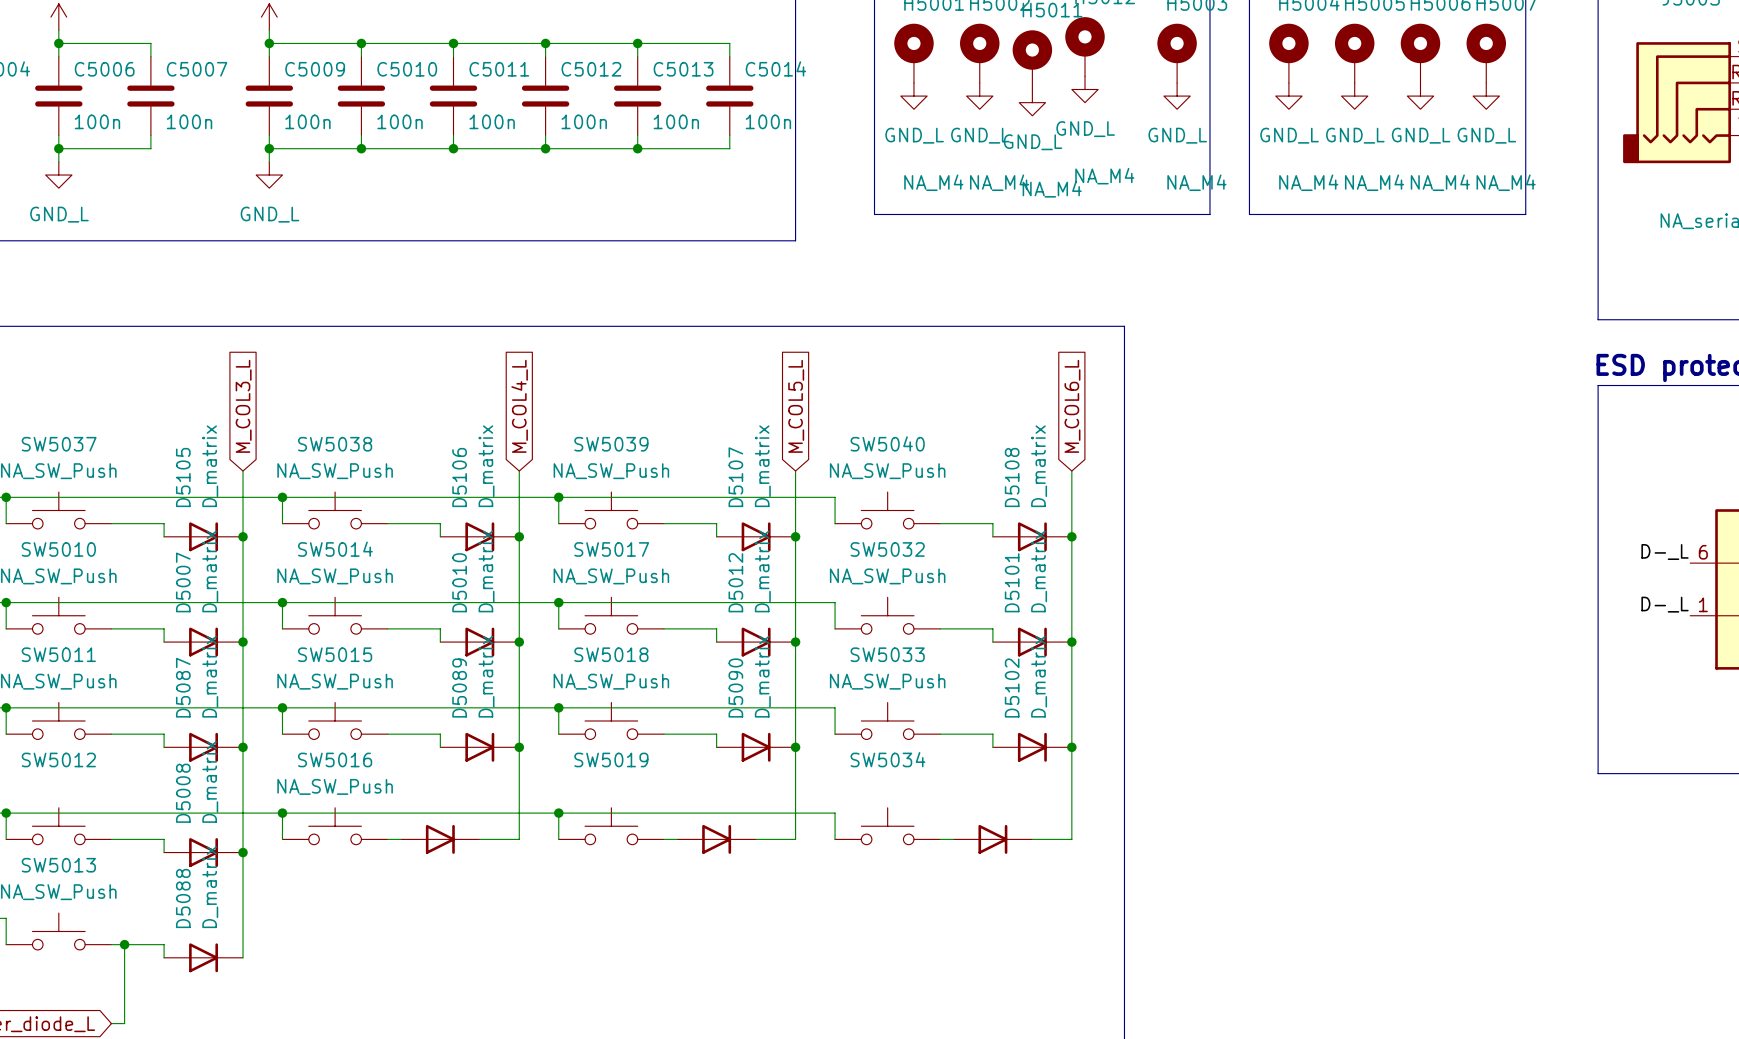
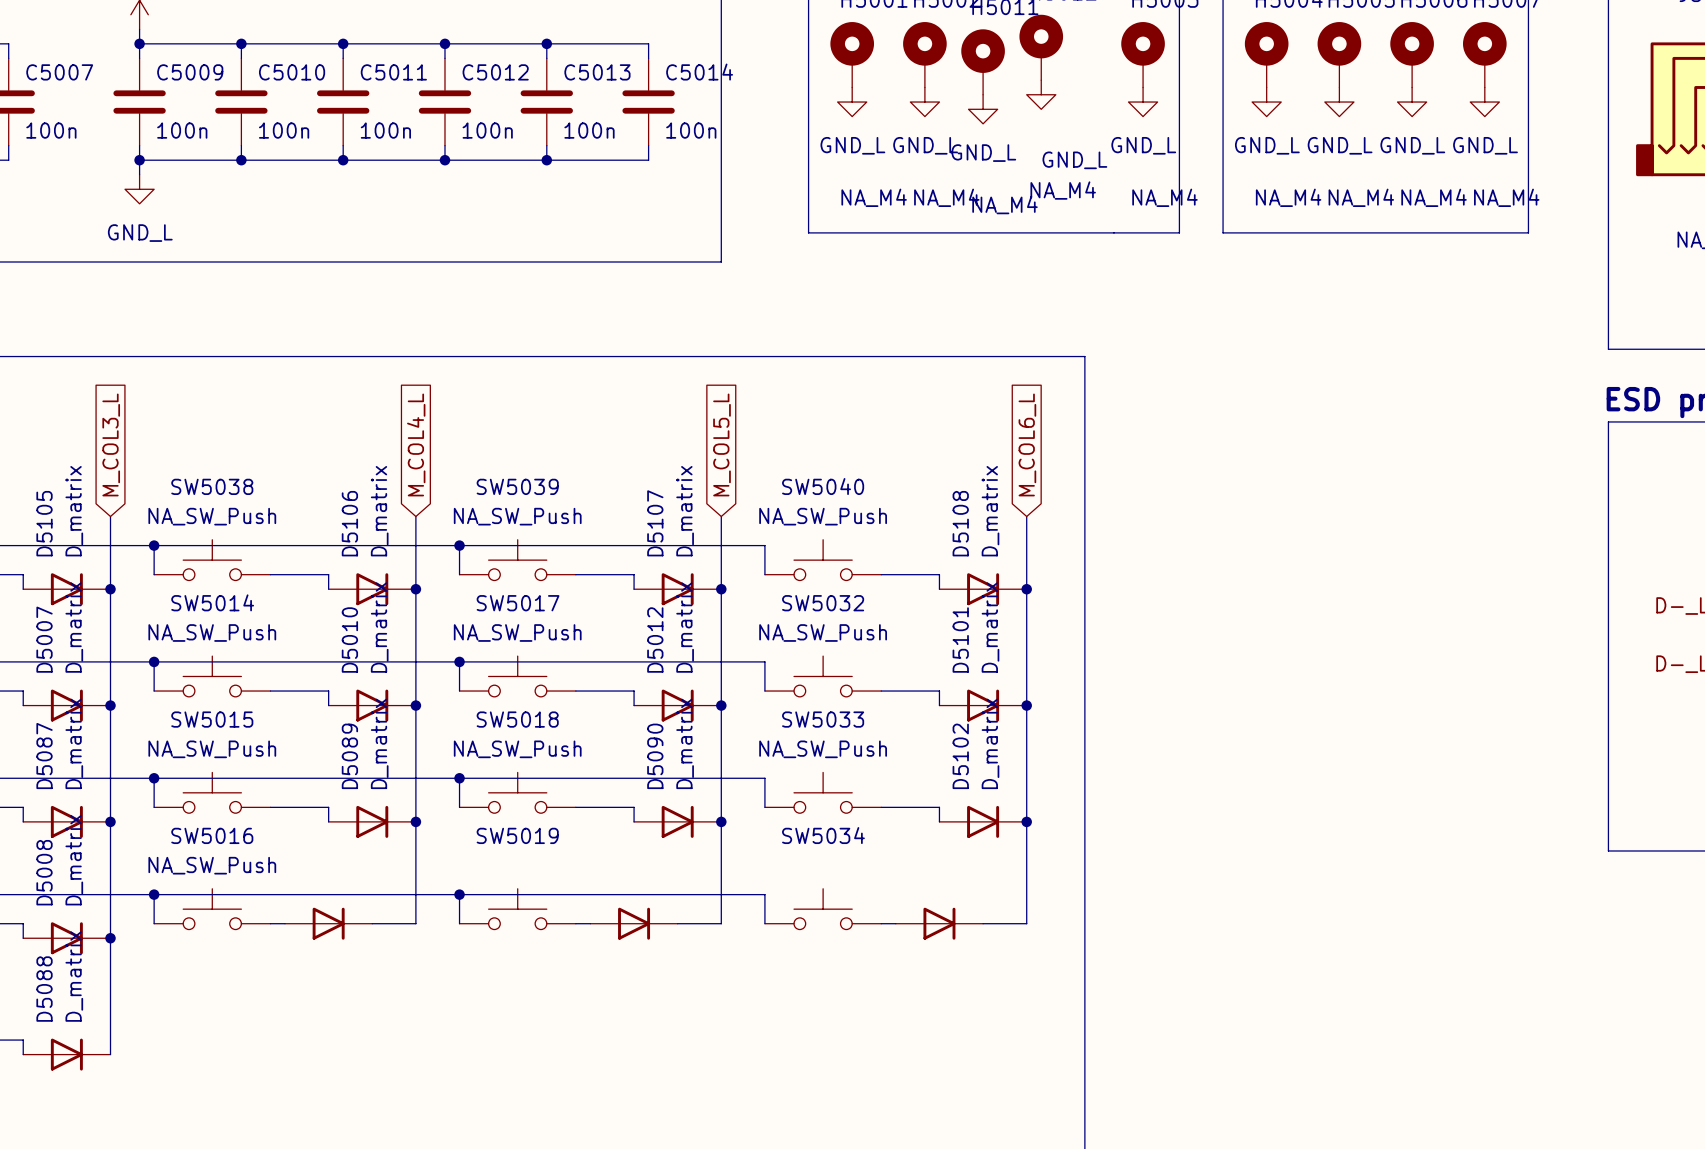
power symbol text position: GND_L (1085, 129) -> GND_L (1074, 160)

